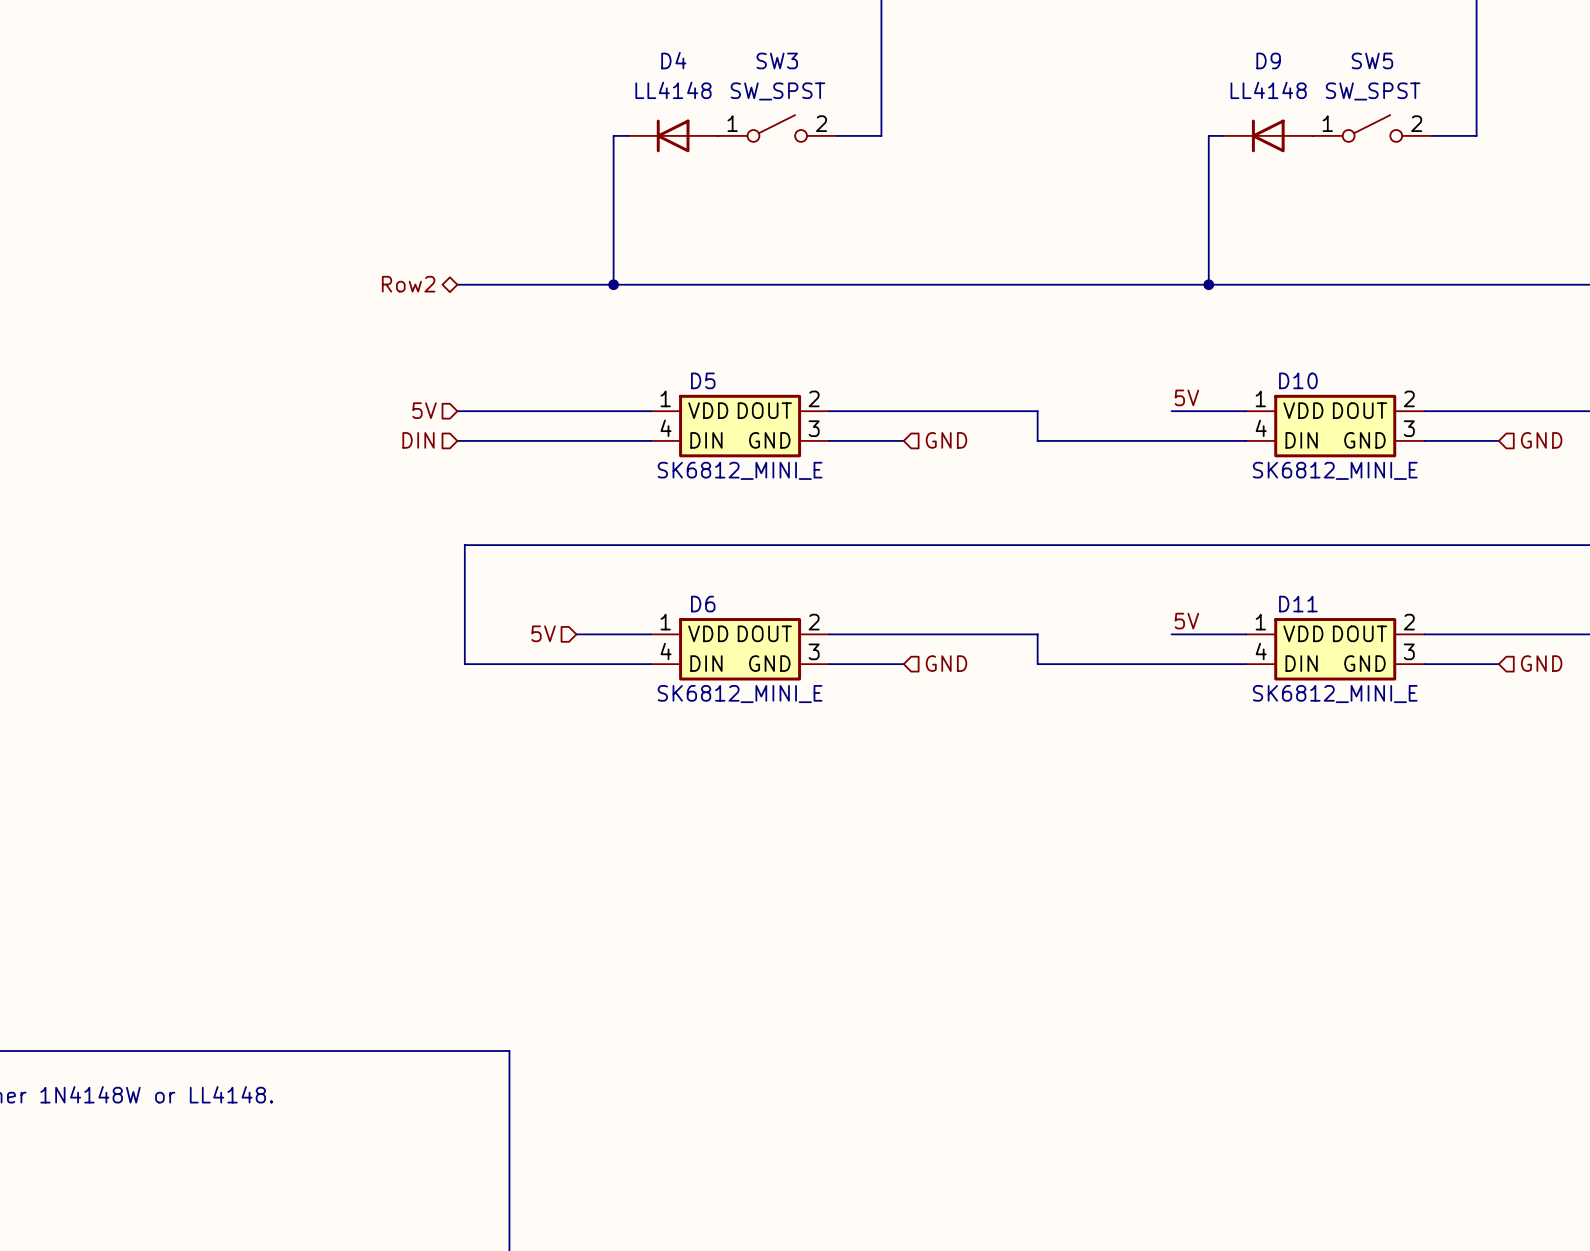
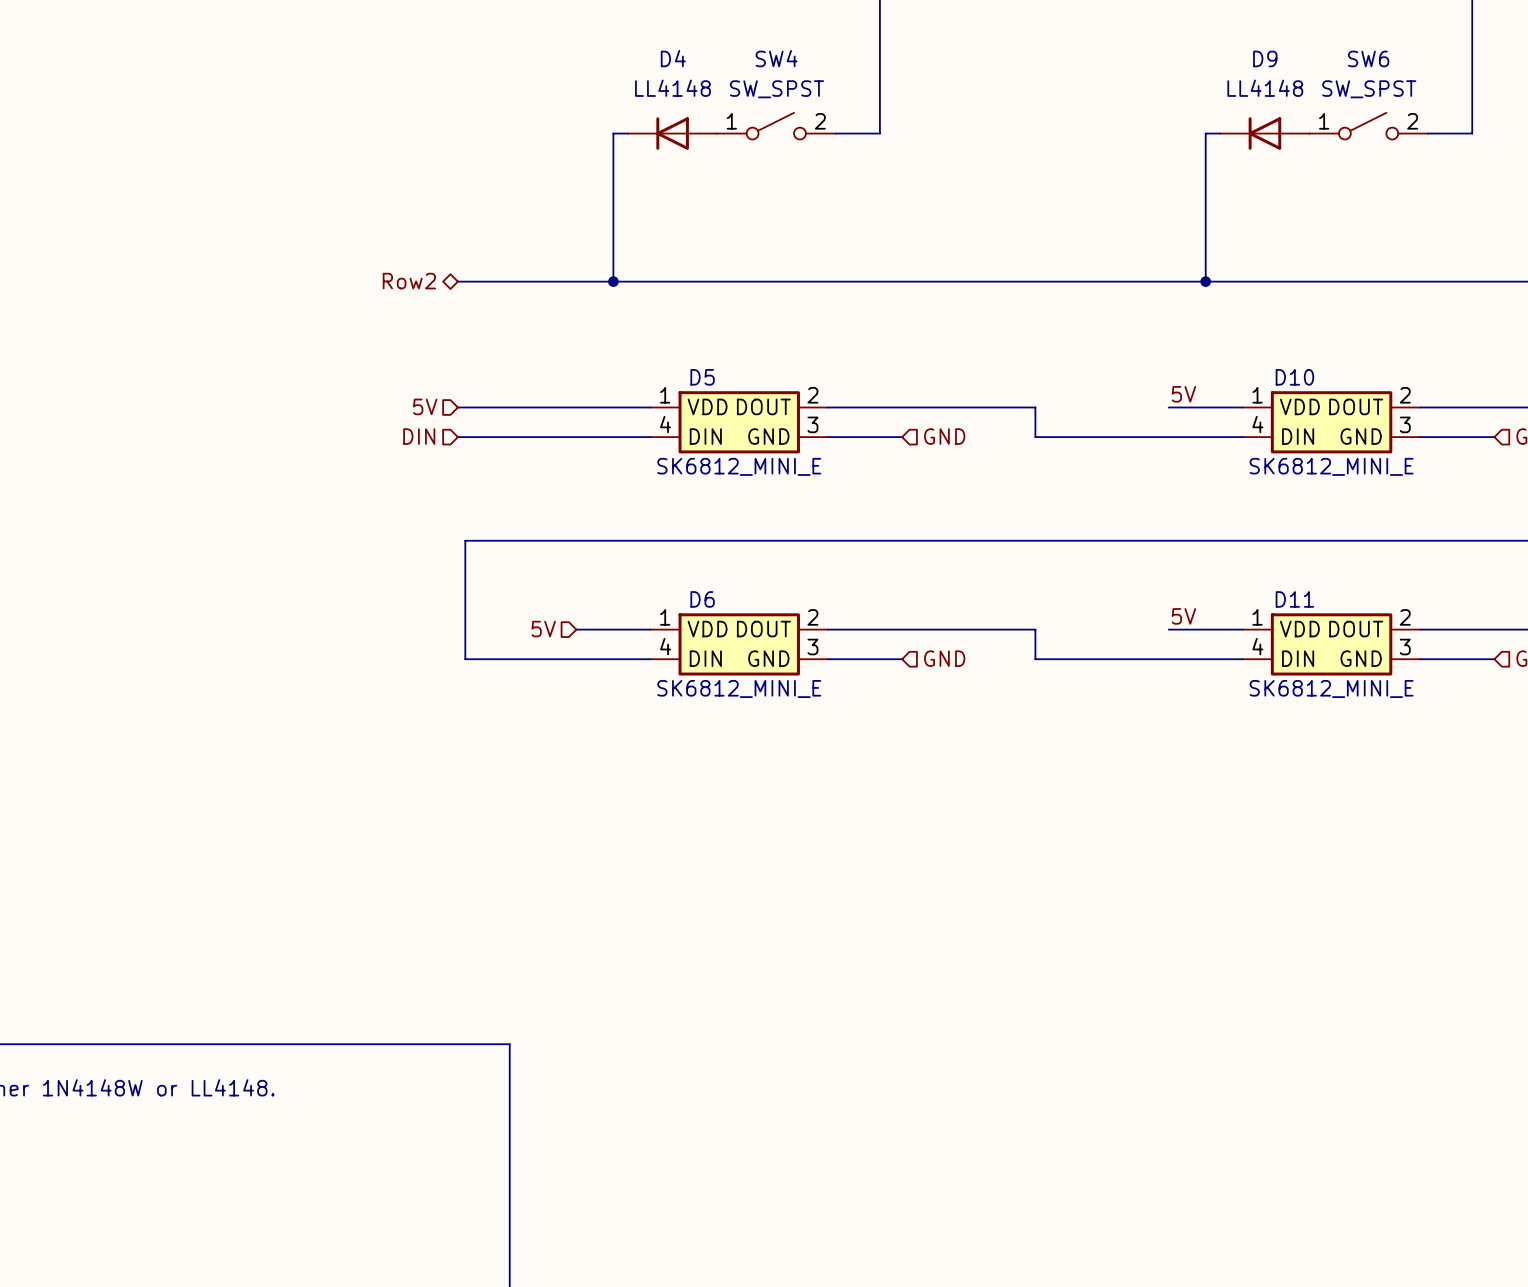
SW3 name: SW3 (777, 60) -> SW4 (776, 58)
SW5 name: SW5 (1372, 60) -> SW6 (1368, 58)

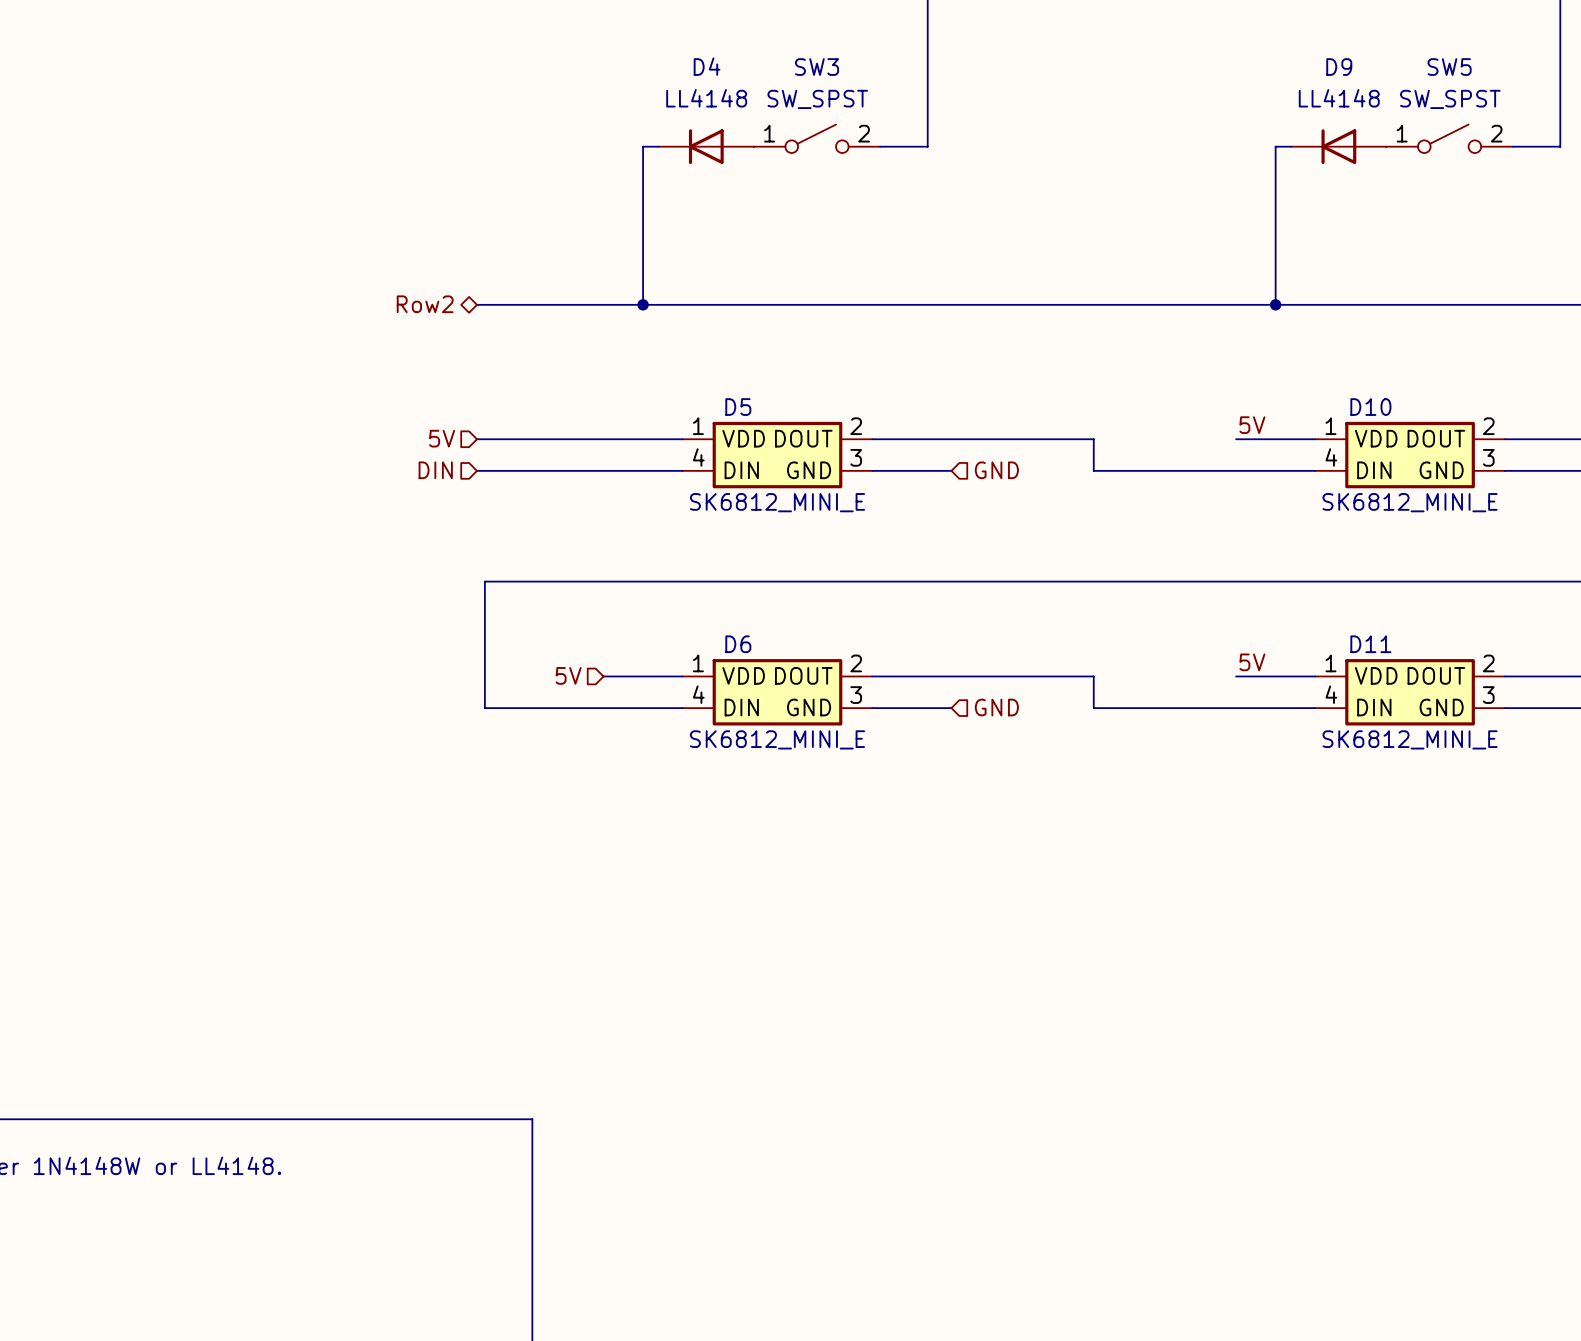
SW4 name: SW4 (776, 58) -> SW3 (817, 67)
SW6 name: SW6 (1368, 58) -> SW5 (1449, 67)

